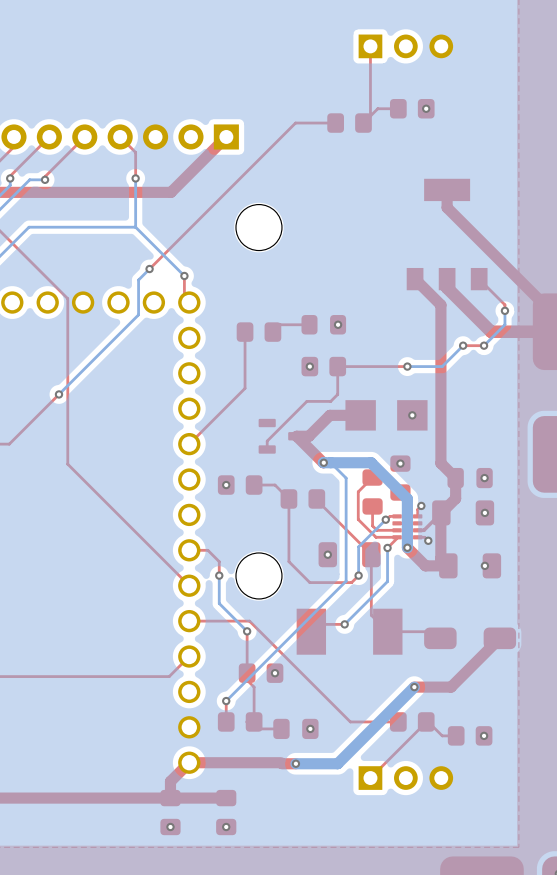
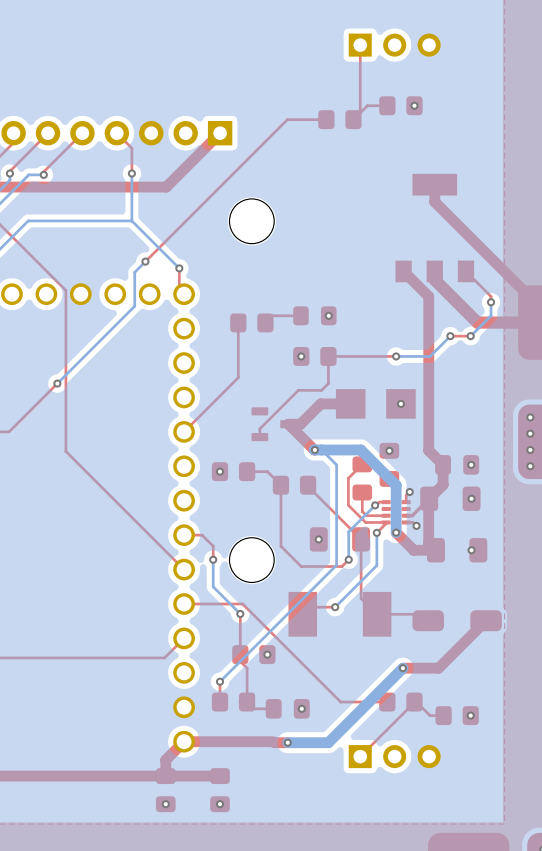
via: none -> (530, 417)
via: none -> (530, 433)
via: none -> (530, 449)
via: none -> (530, 466)

